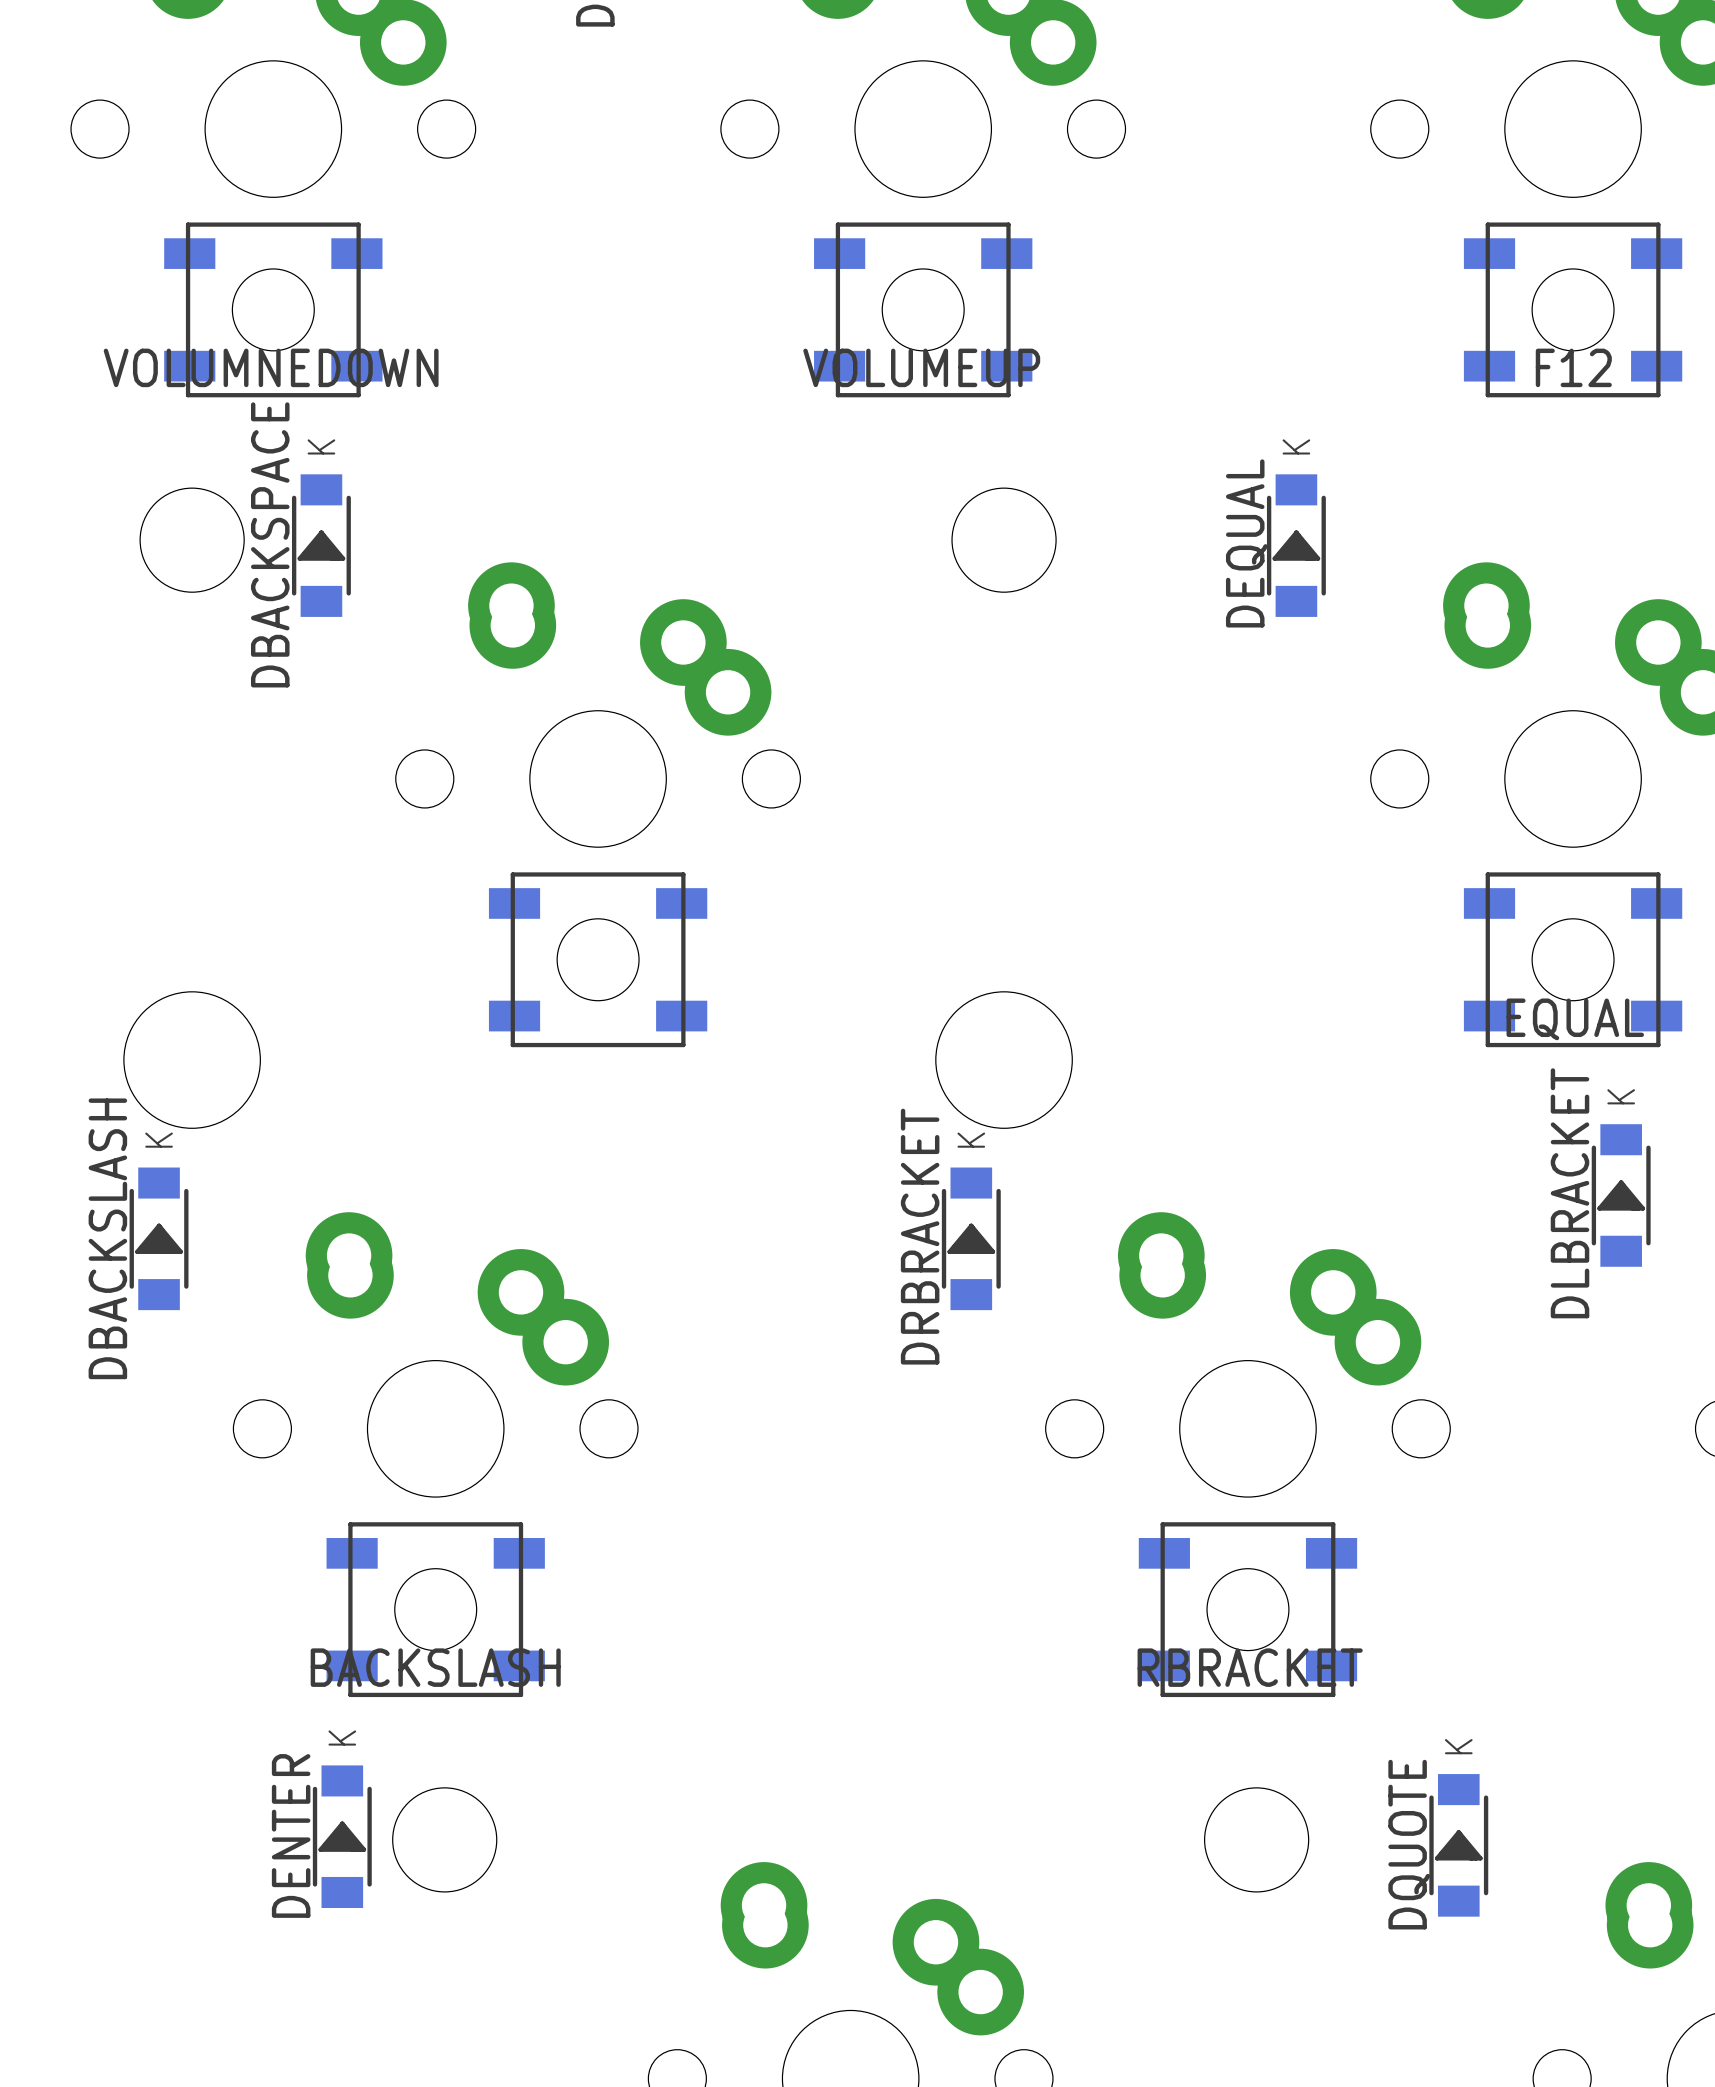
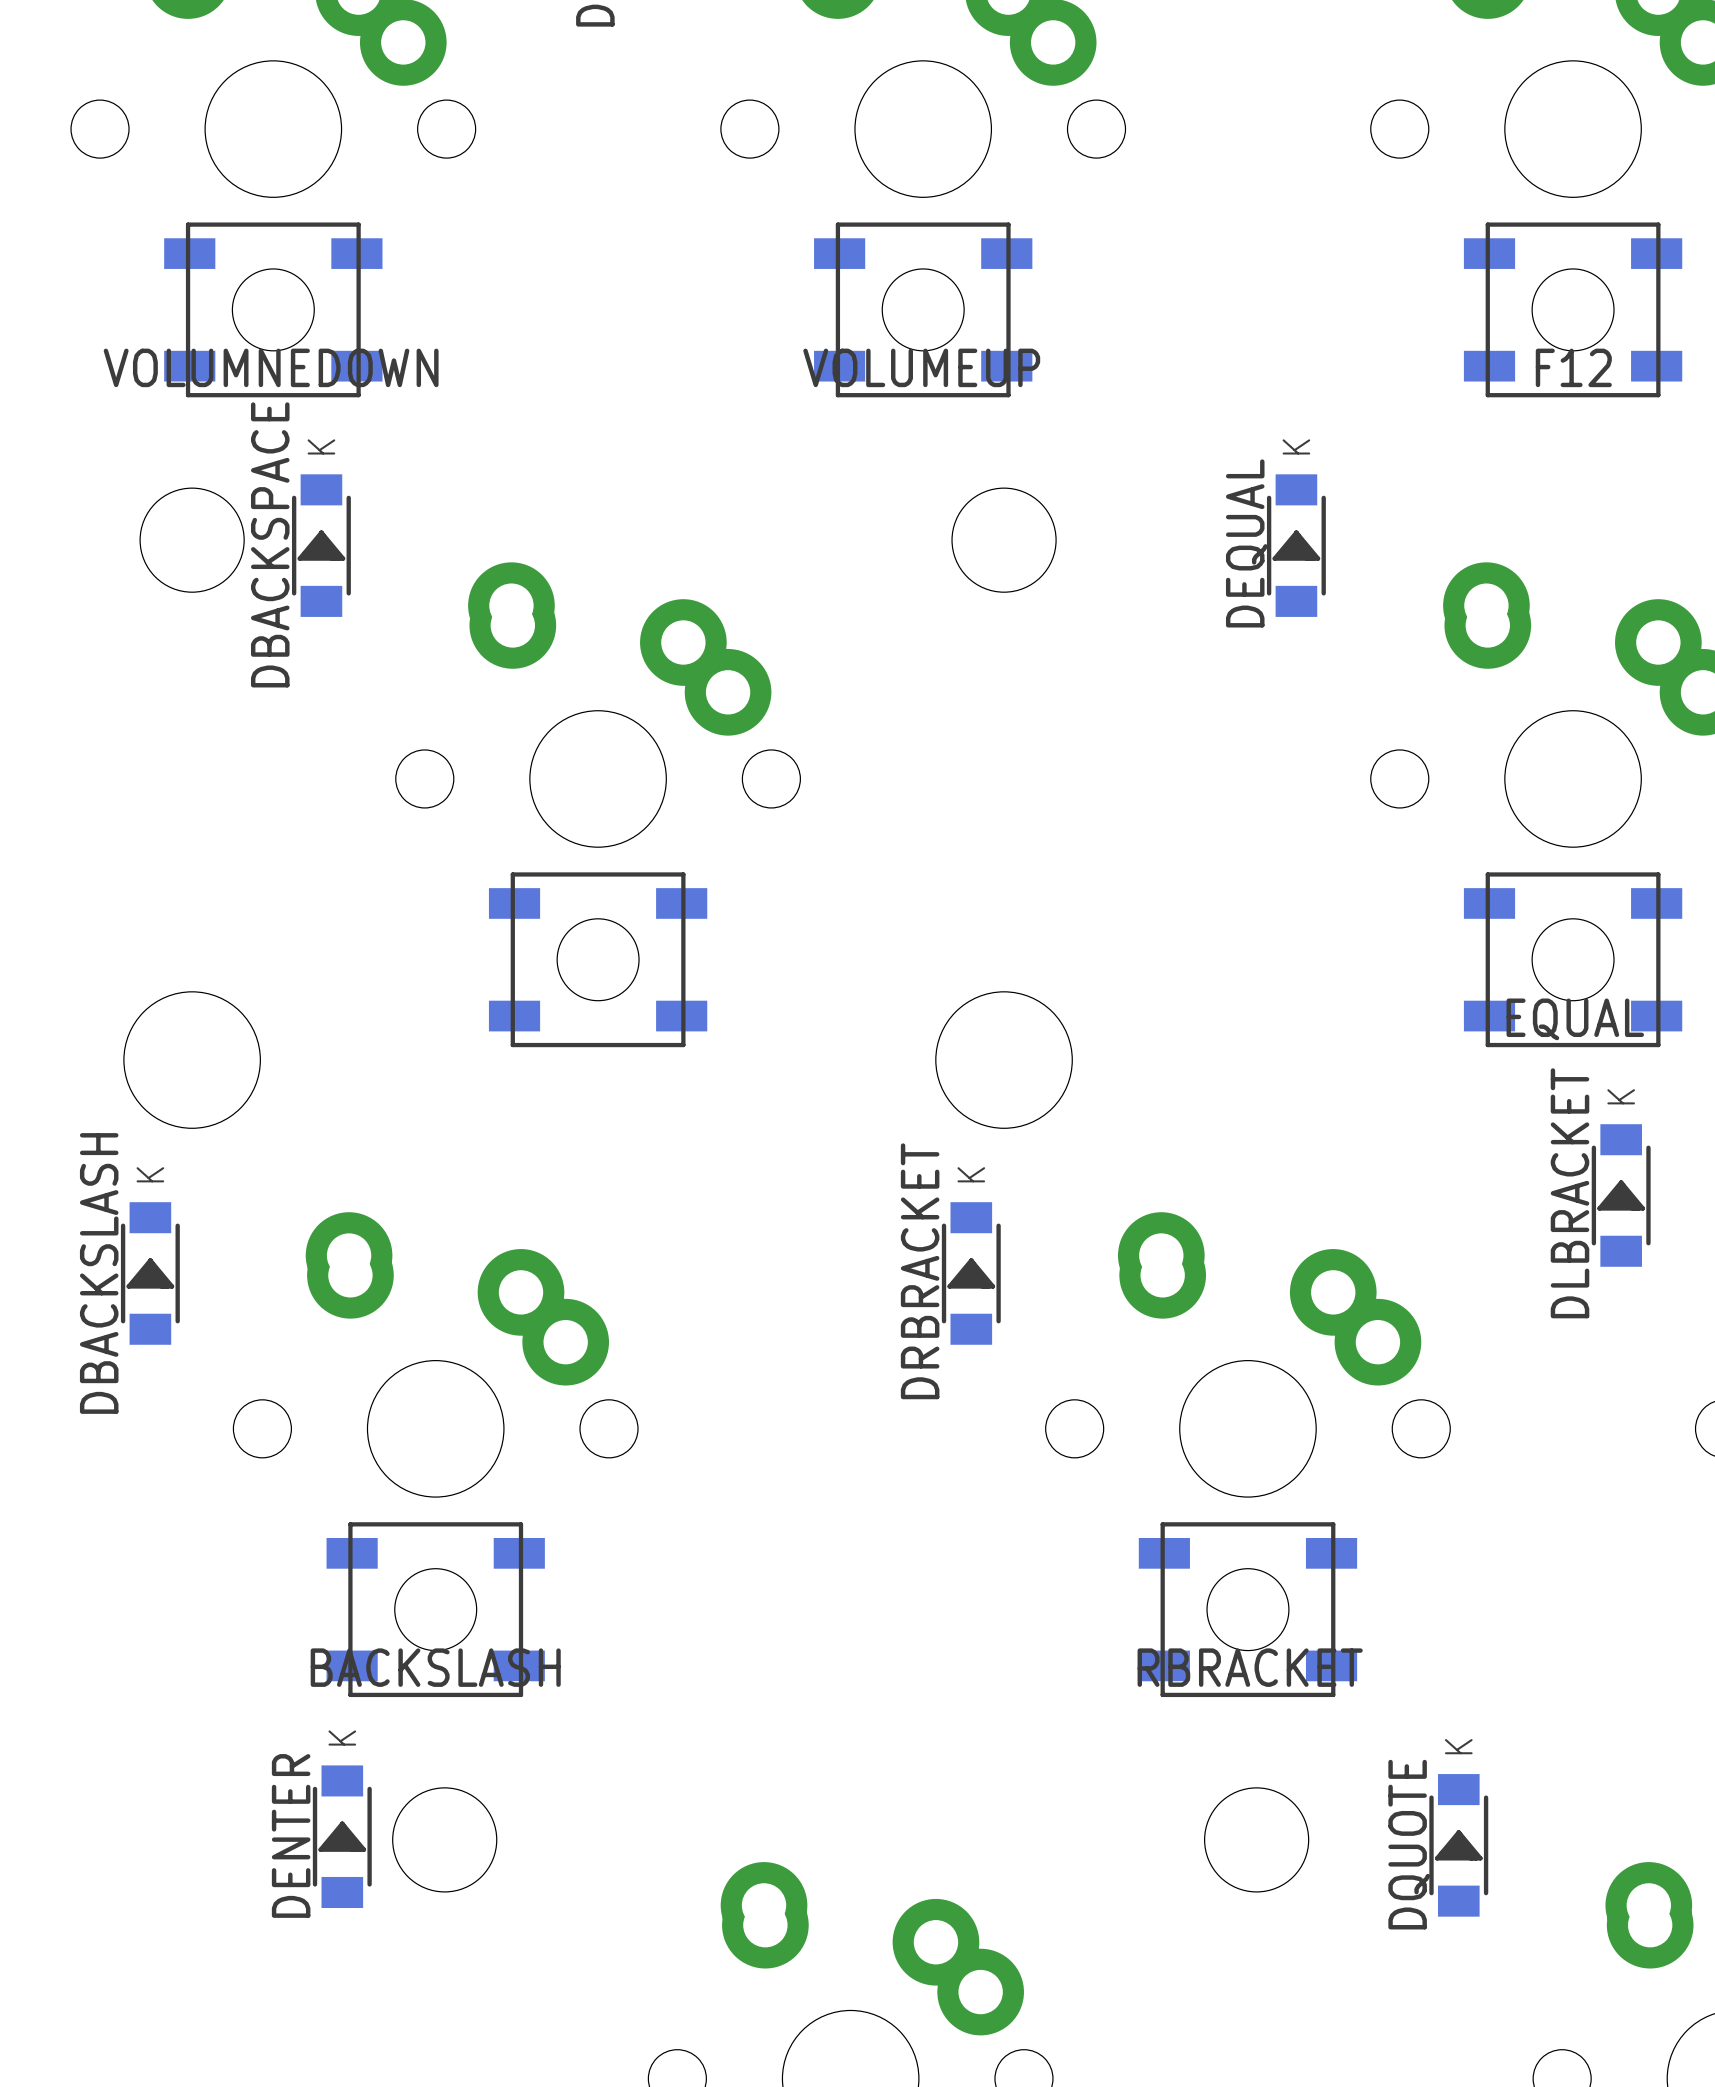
DBACKSLASH position: (159, 1238) -> (150, 1273)
DRBRACKET position: (971, 1238) -> (971, 1273)

